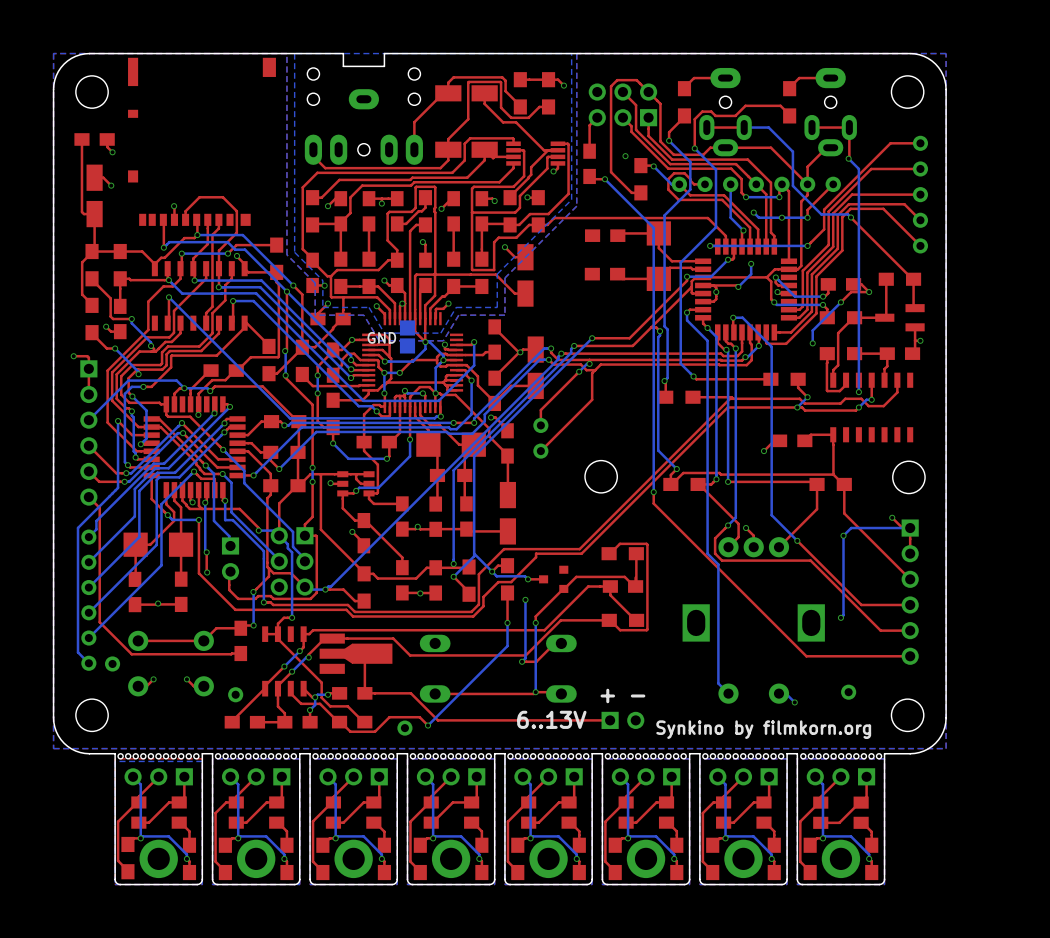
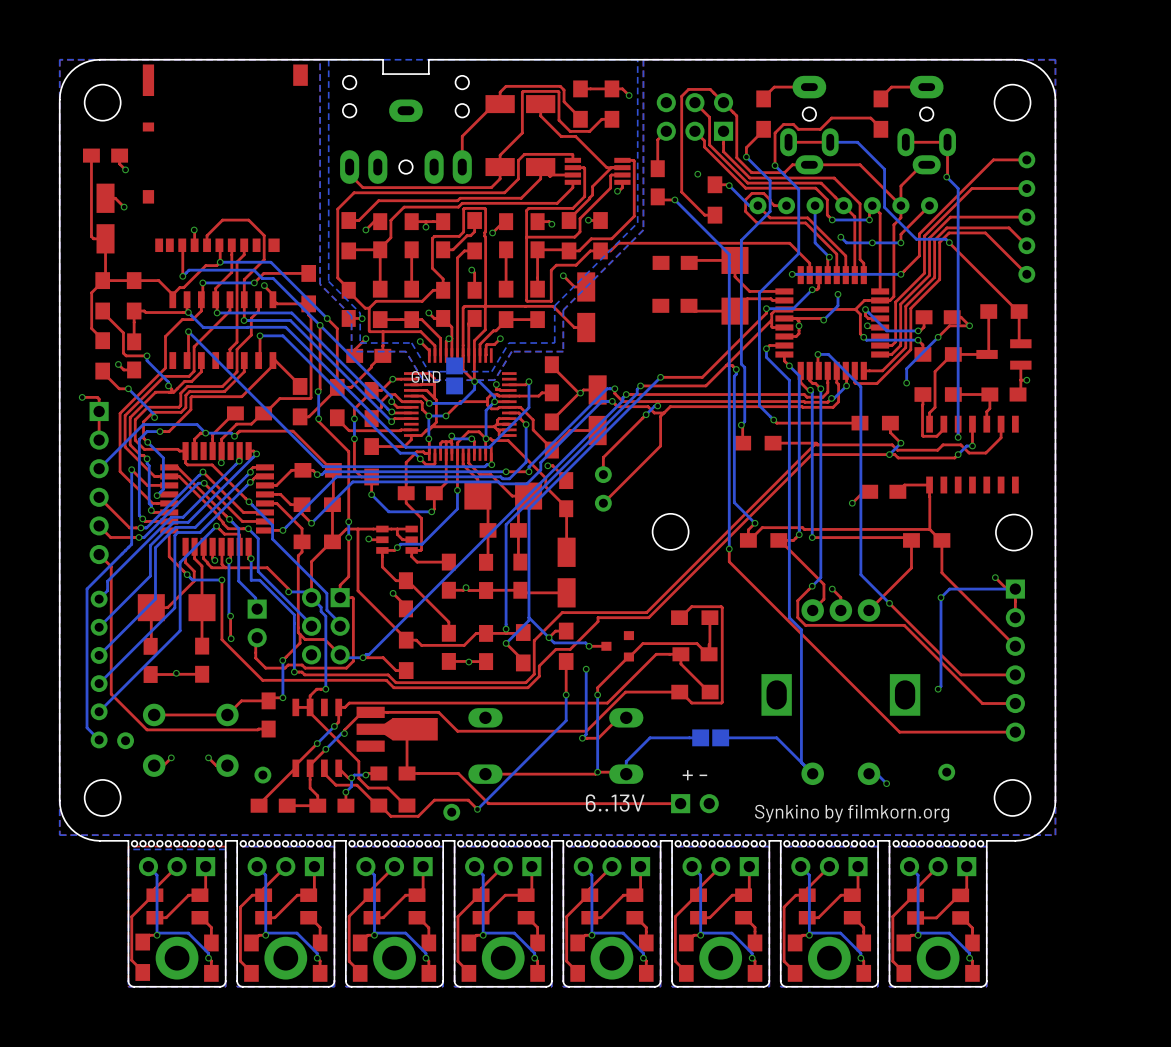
bottom track: none -> (700, 737) (650, 737) (626, 761) (626, 774)
part: none -> (700, 737)
bottom track: none -> (720, 737) (776, 737) (801, 762)
part: none -> (720, 737)

